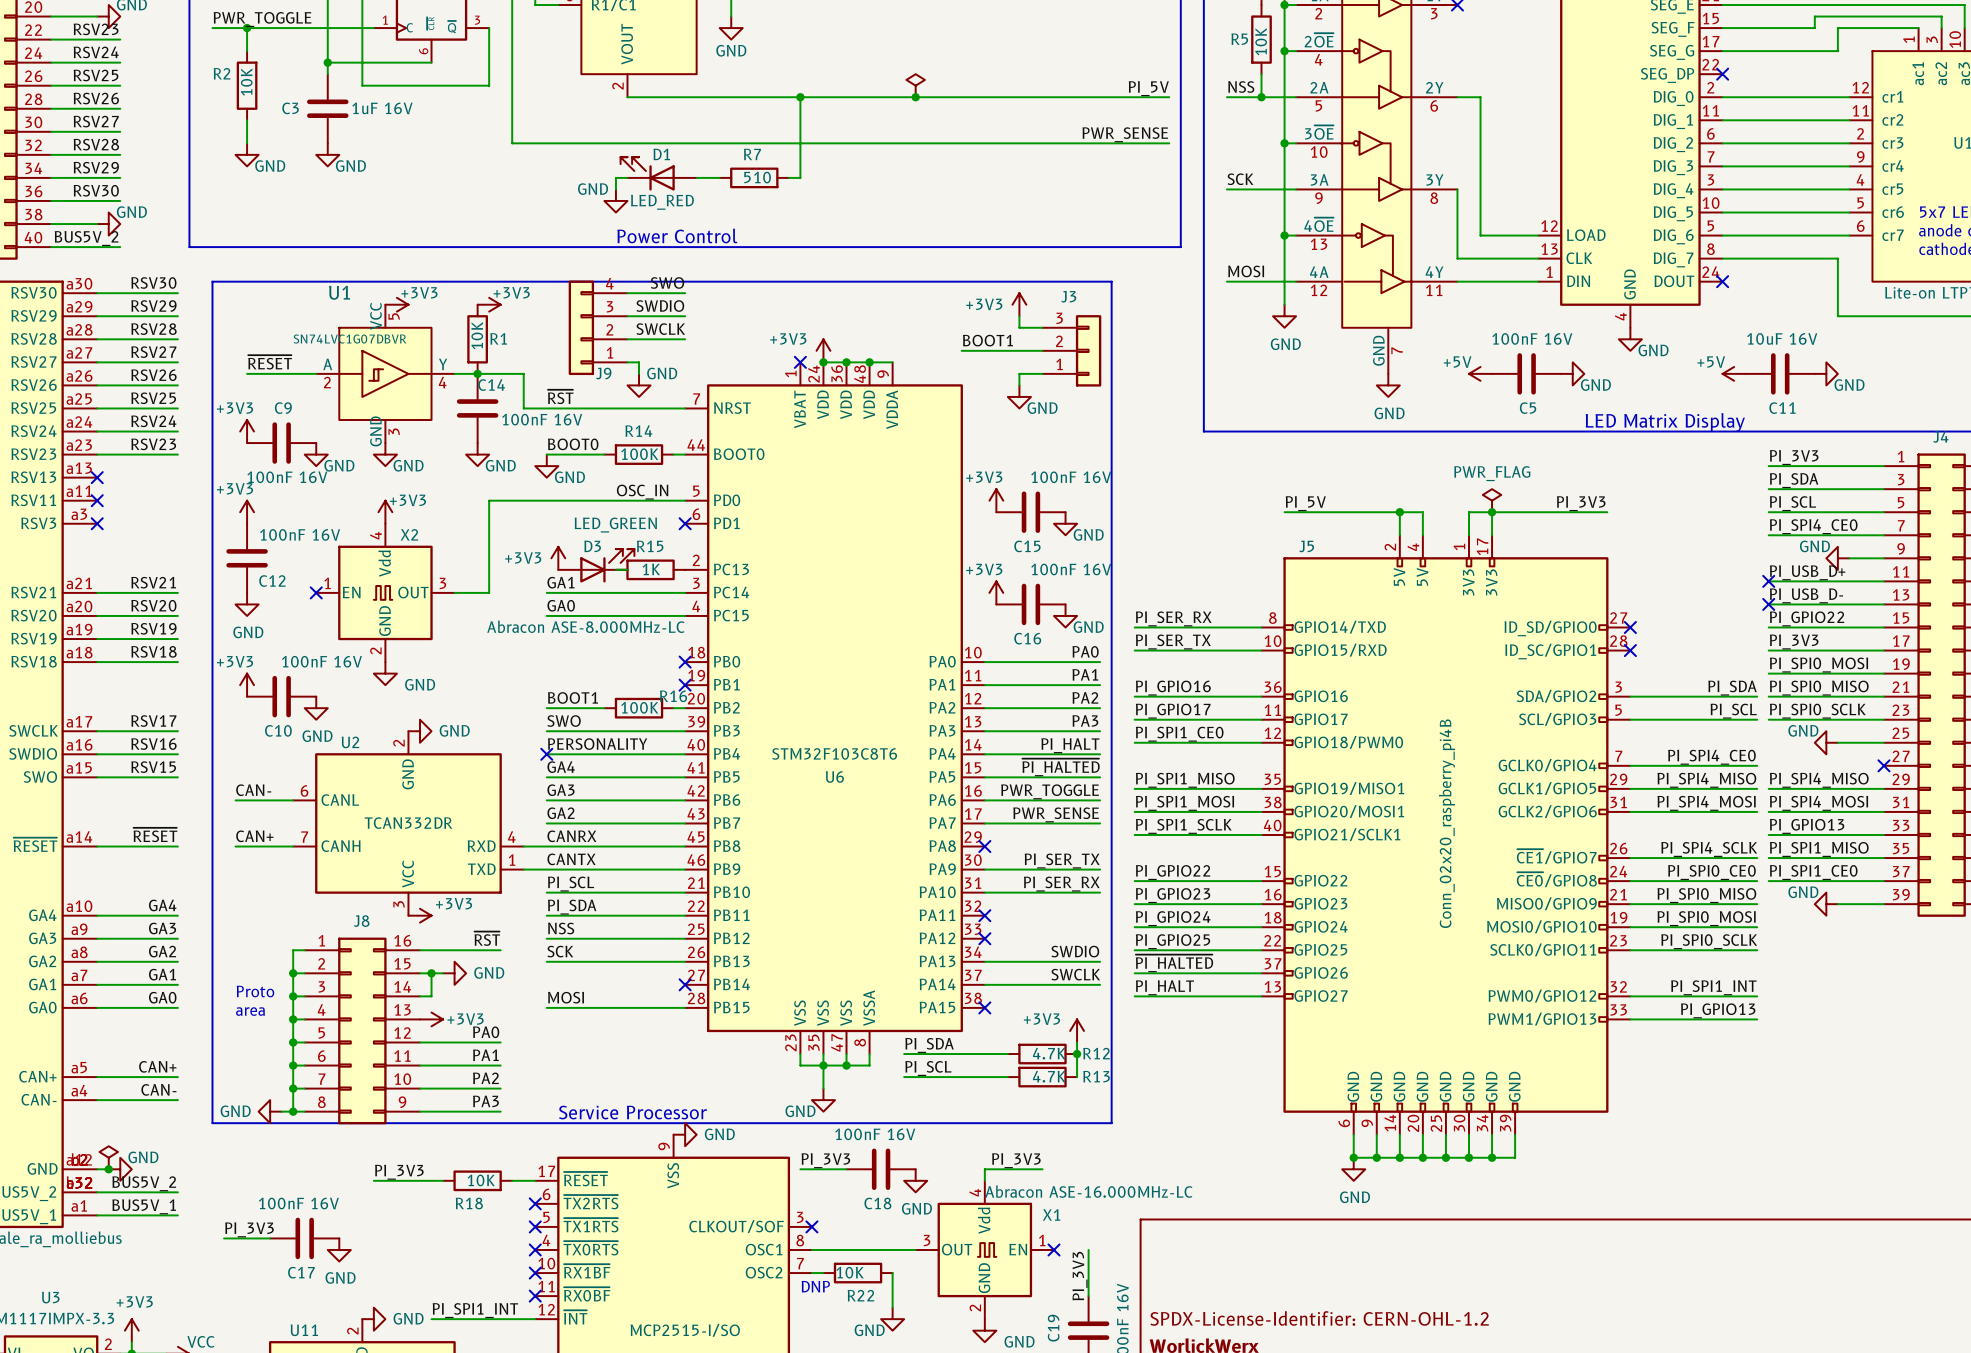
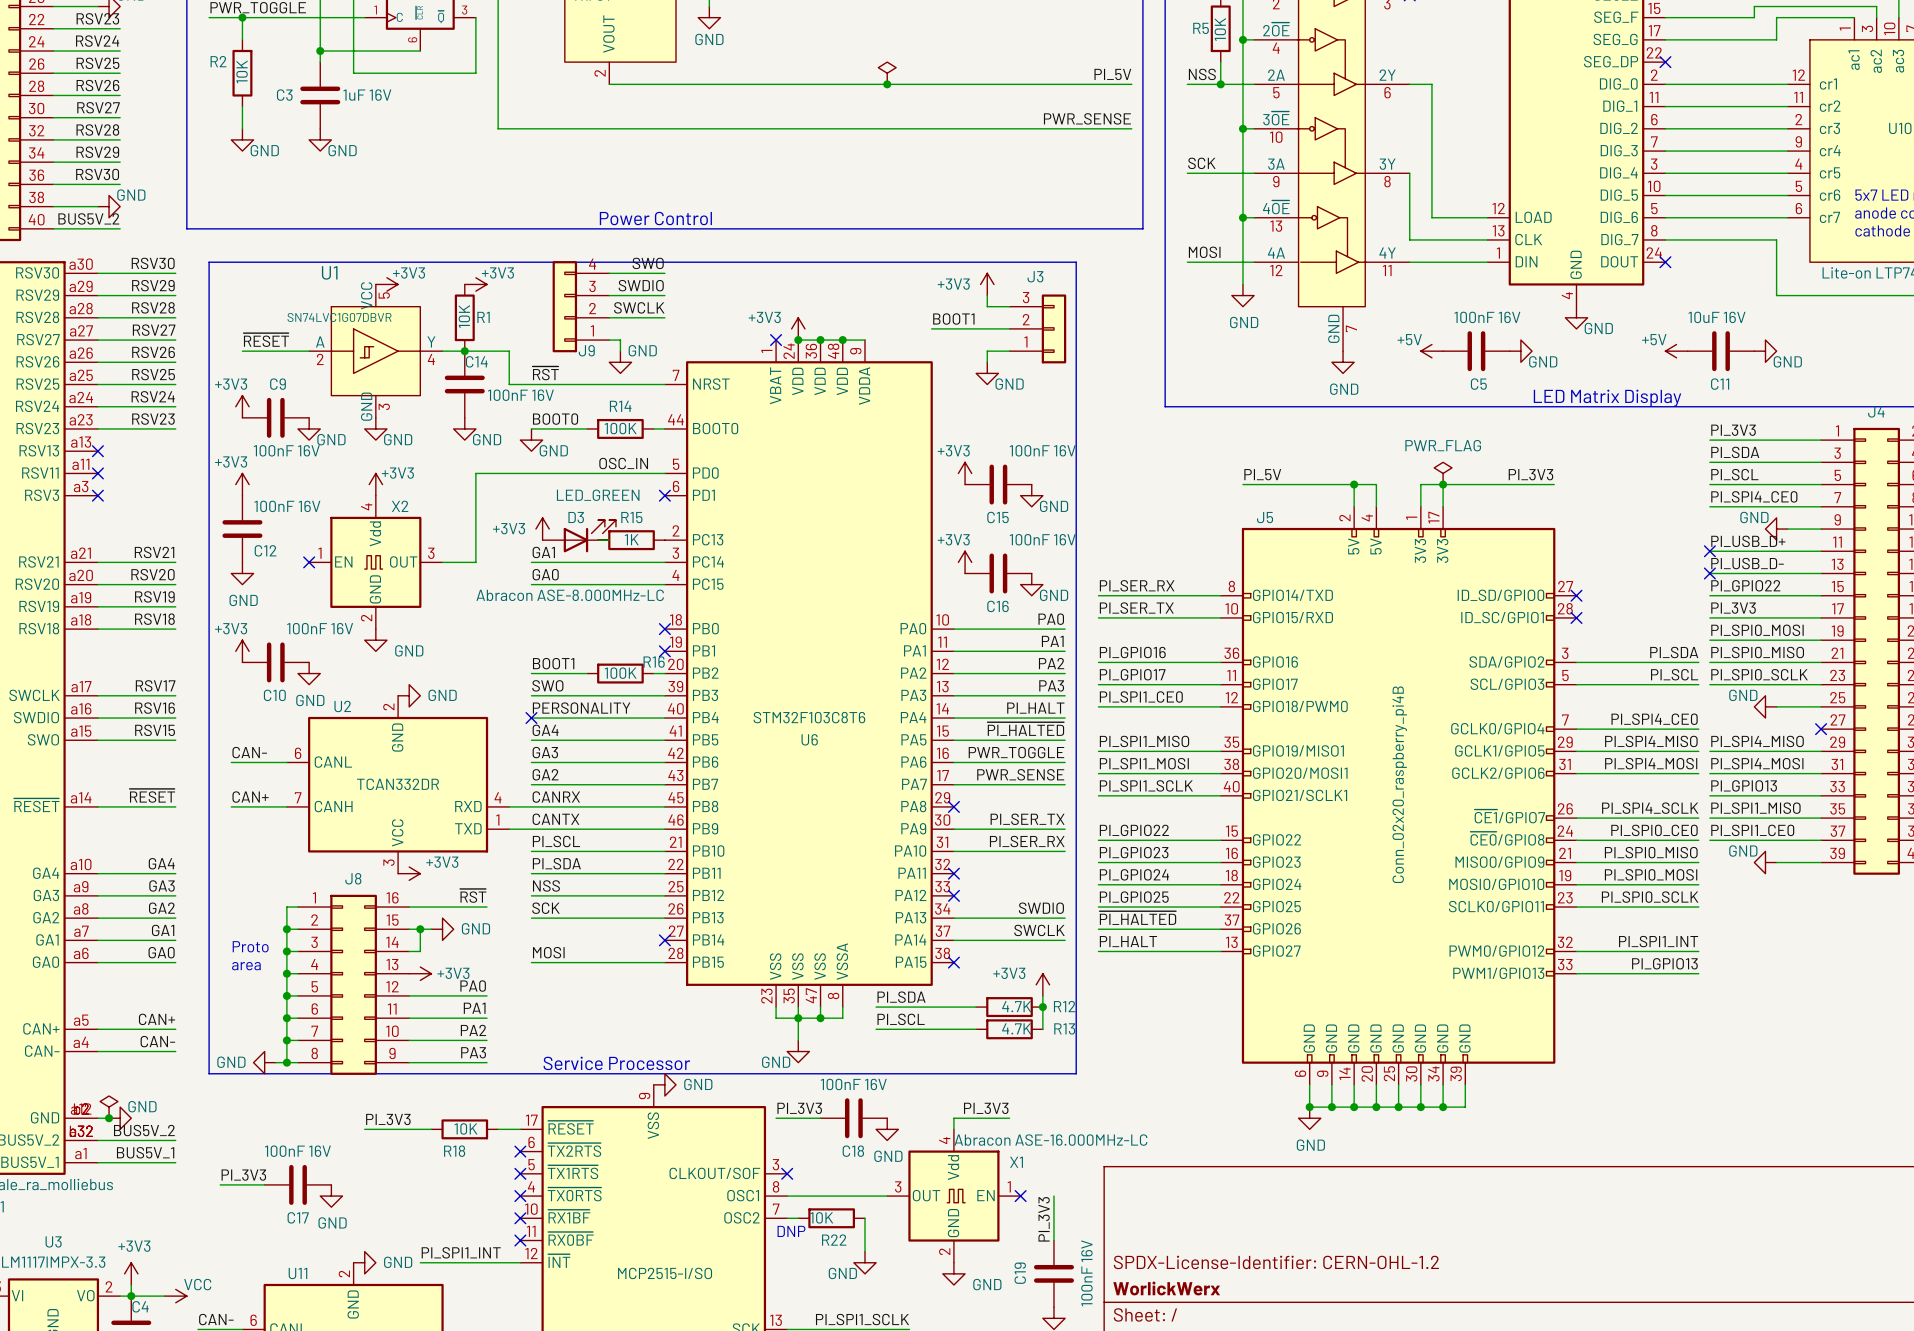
wire: (800, 97) (800, 177) (788, 177) -> none
junction: (800, 97) -> none
D1: LED_RED (658, 173) -> none
wire: (627, 177) (615, 177) (615, 189) -> none
wire: (696, 177) (719, 177) -> none
R7: 510 (754, 177) -> none
power symbol: GND (615, 200) -> none

